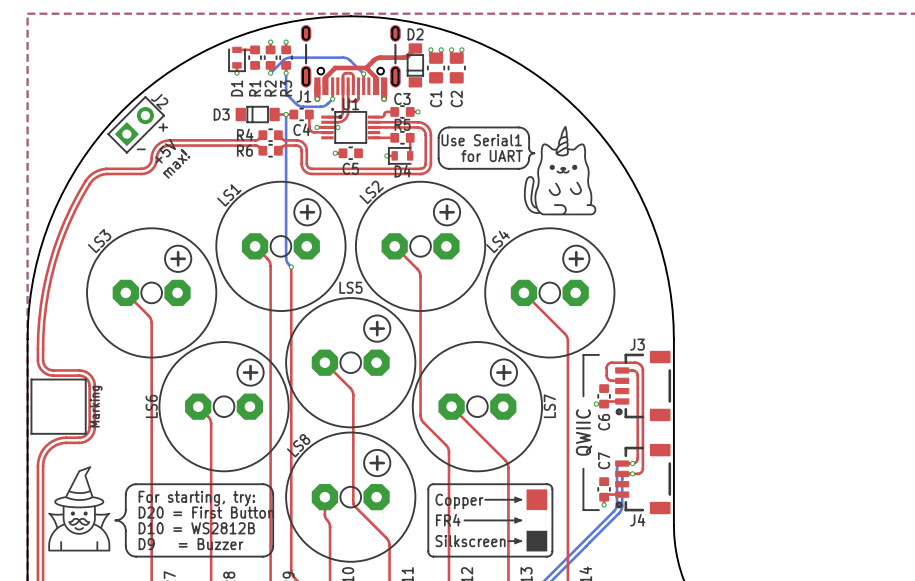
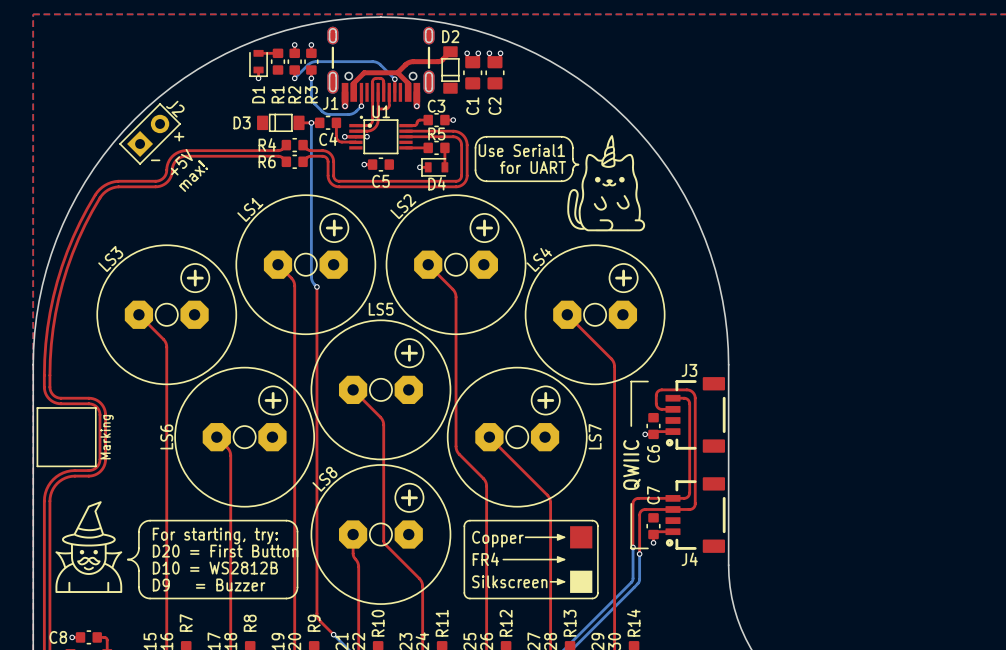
top track: none -> (672, 498) (638, 498) (634, 500) (632, 547)
bottom track: (632, 463) (621, 463) (617, 466) (616, 507) (583, 541) -> (633, 547) (631, 582)
via: (632, 463) -> none
top track: none -> (672, 509) (644, 509) (640, 511) (639, 553)
bottom track: (632, 473) (625, 474) (622, 477) (620, 510) (589, 542) -> (639, 553) (637, 583)
via: (632, 473) -> none
via: none -> (633, 547)
via: none -> (639, 553)

